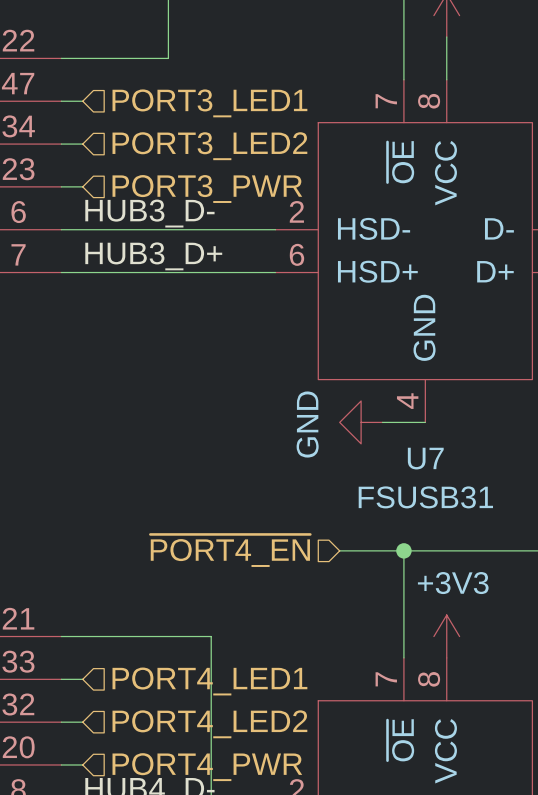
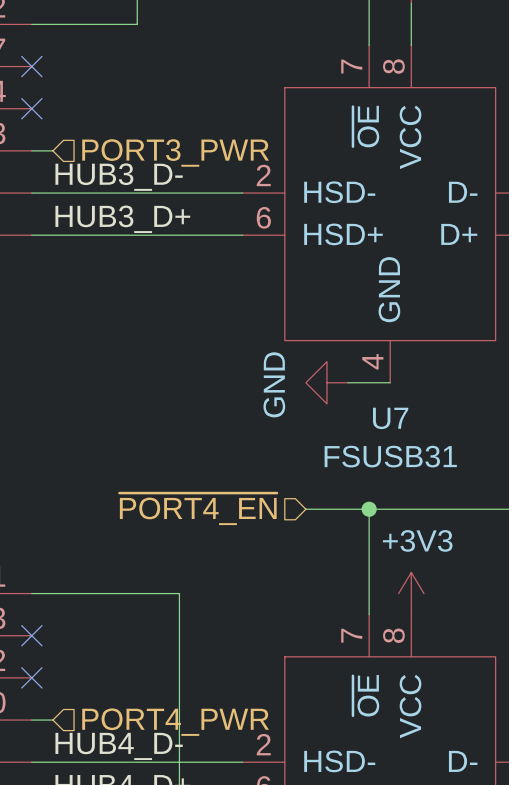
wire: (61, 101) (82, 101) -> none
no-connect mark: none -> (31, 66)
hierarchical label: PORT3_LED1 (209, 103) -> none
wire: (61, 144) (82, 144) -> none
no-connect mark: none -> (31, 108)
hierarchical label: PORT3_LED2 (209, 146) -> none
wire: (61, 679) (82, 679) -> none
no-connect mark: none -> (31, 635)
hierarchical label: PORT4_LED1 (209, 681) -> none
wire: (61, 722) (82, 722) -> none
no-connect mark: none -> (31, 677)
hierarchical label: PORT4_LED2 (209, 724) -> none

